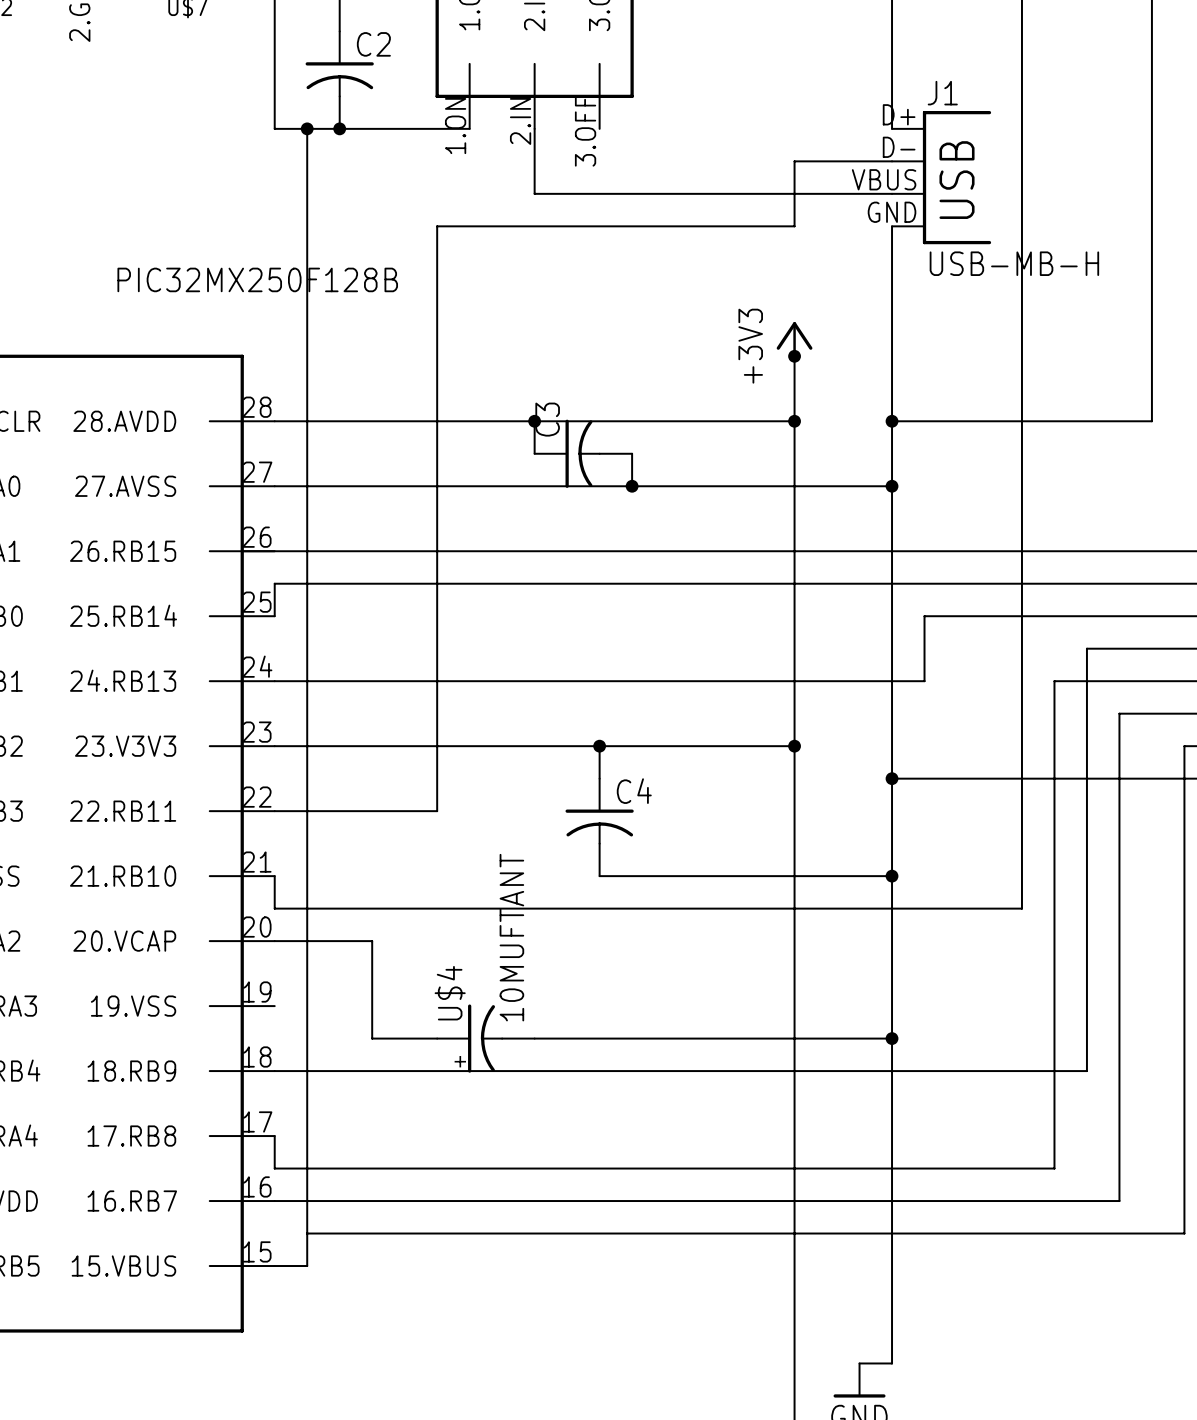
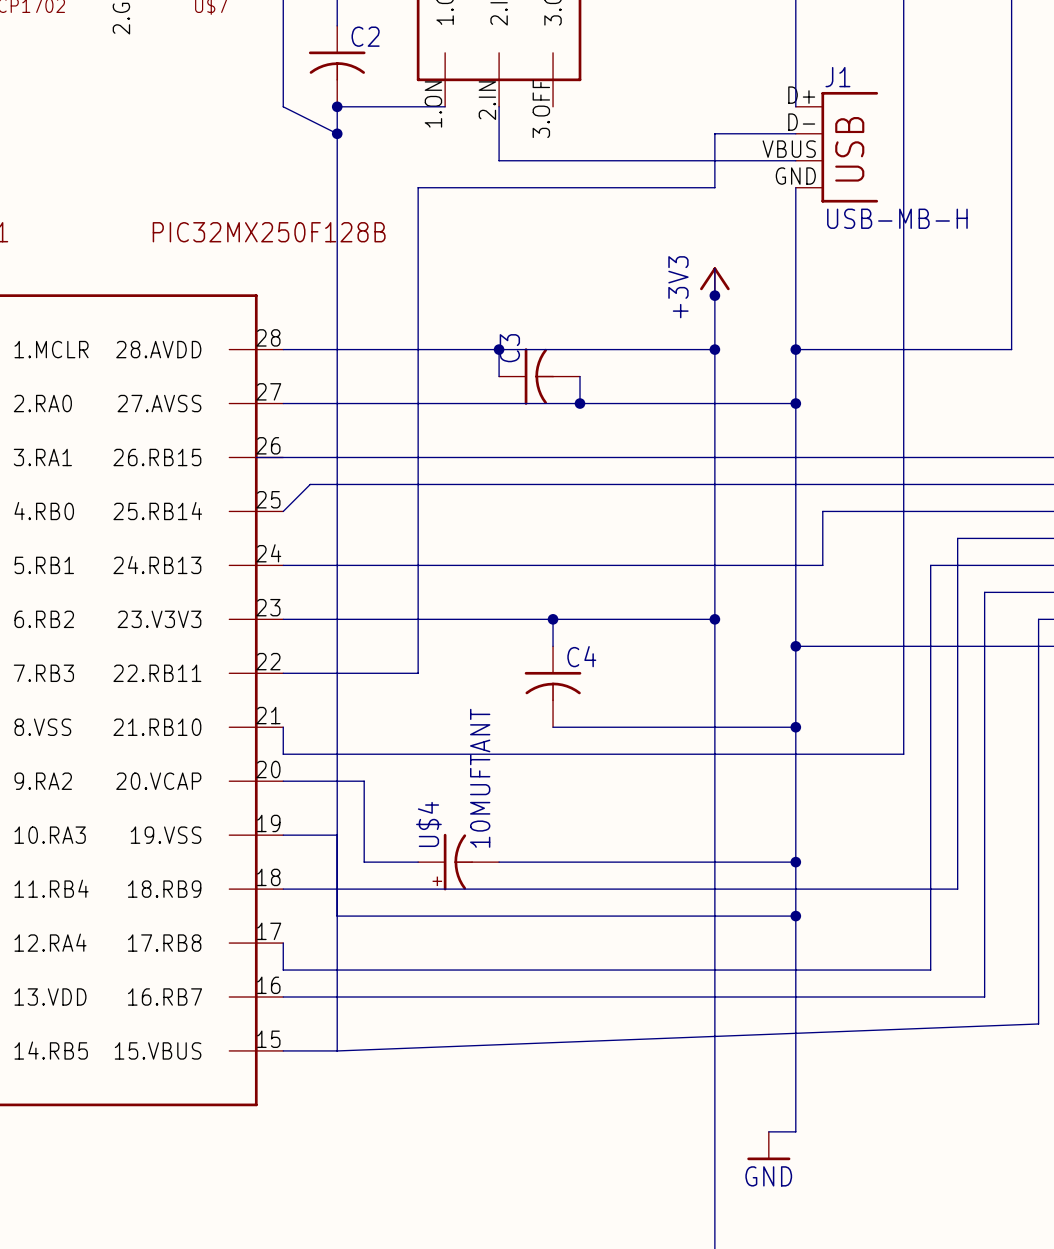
wire: (274, 128) (339, 128) -> (283, 106) (337, 133)
wire: (307, 128) (307, 1266) -> (337, 1050) (310, 1050)
junction position: (307, 128) -> (337, 133)
wire: none -> (337, 106) (337, 1050)
wire: (307, 583) (274, 583) (274, 616) -> (310, 484) (283, 511)
wire: none -> (283, 835) (337, 835)
wire: none -> (337, 916) (795, 916)
junction: none -> (795, 916)
wire: (307, 1233) (1184, 1233) -> (337, 1050) (1038, 1023)

